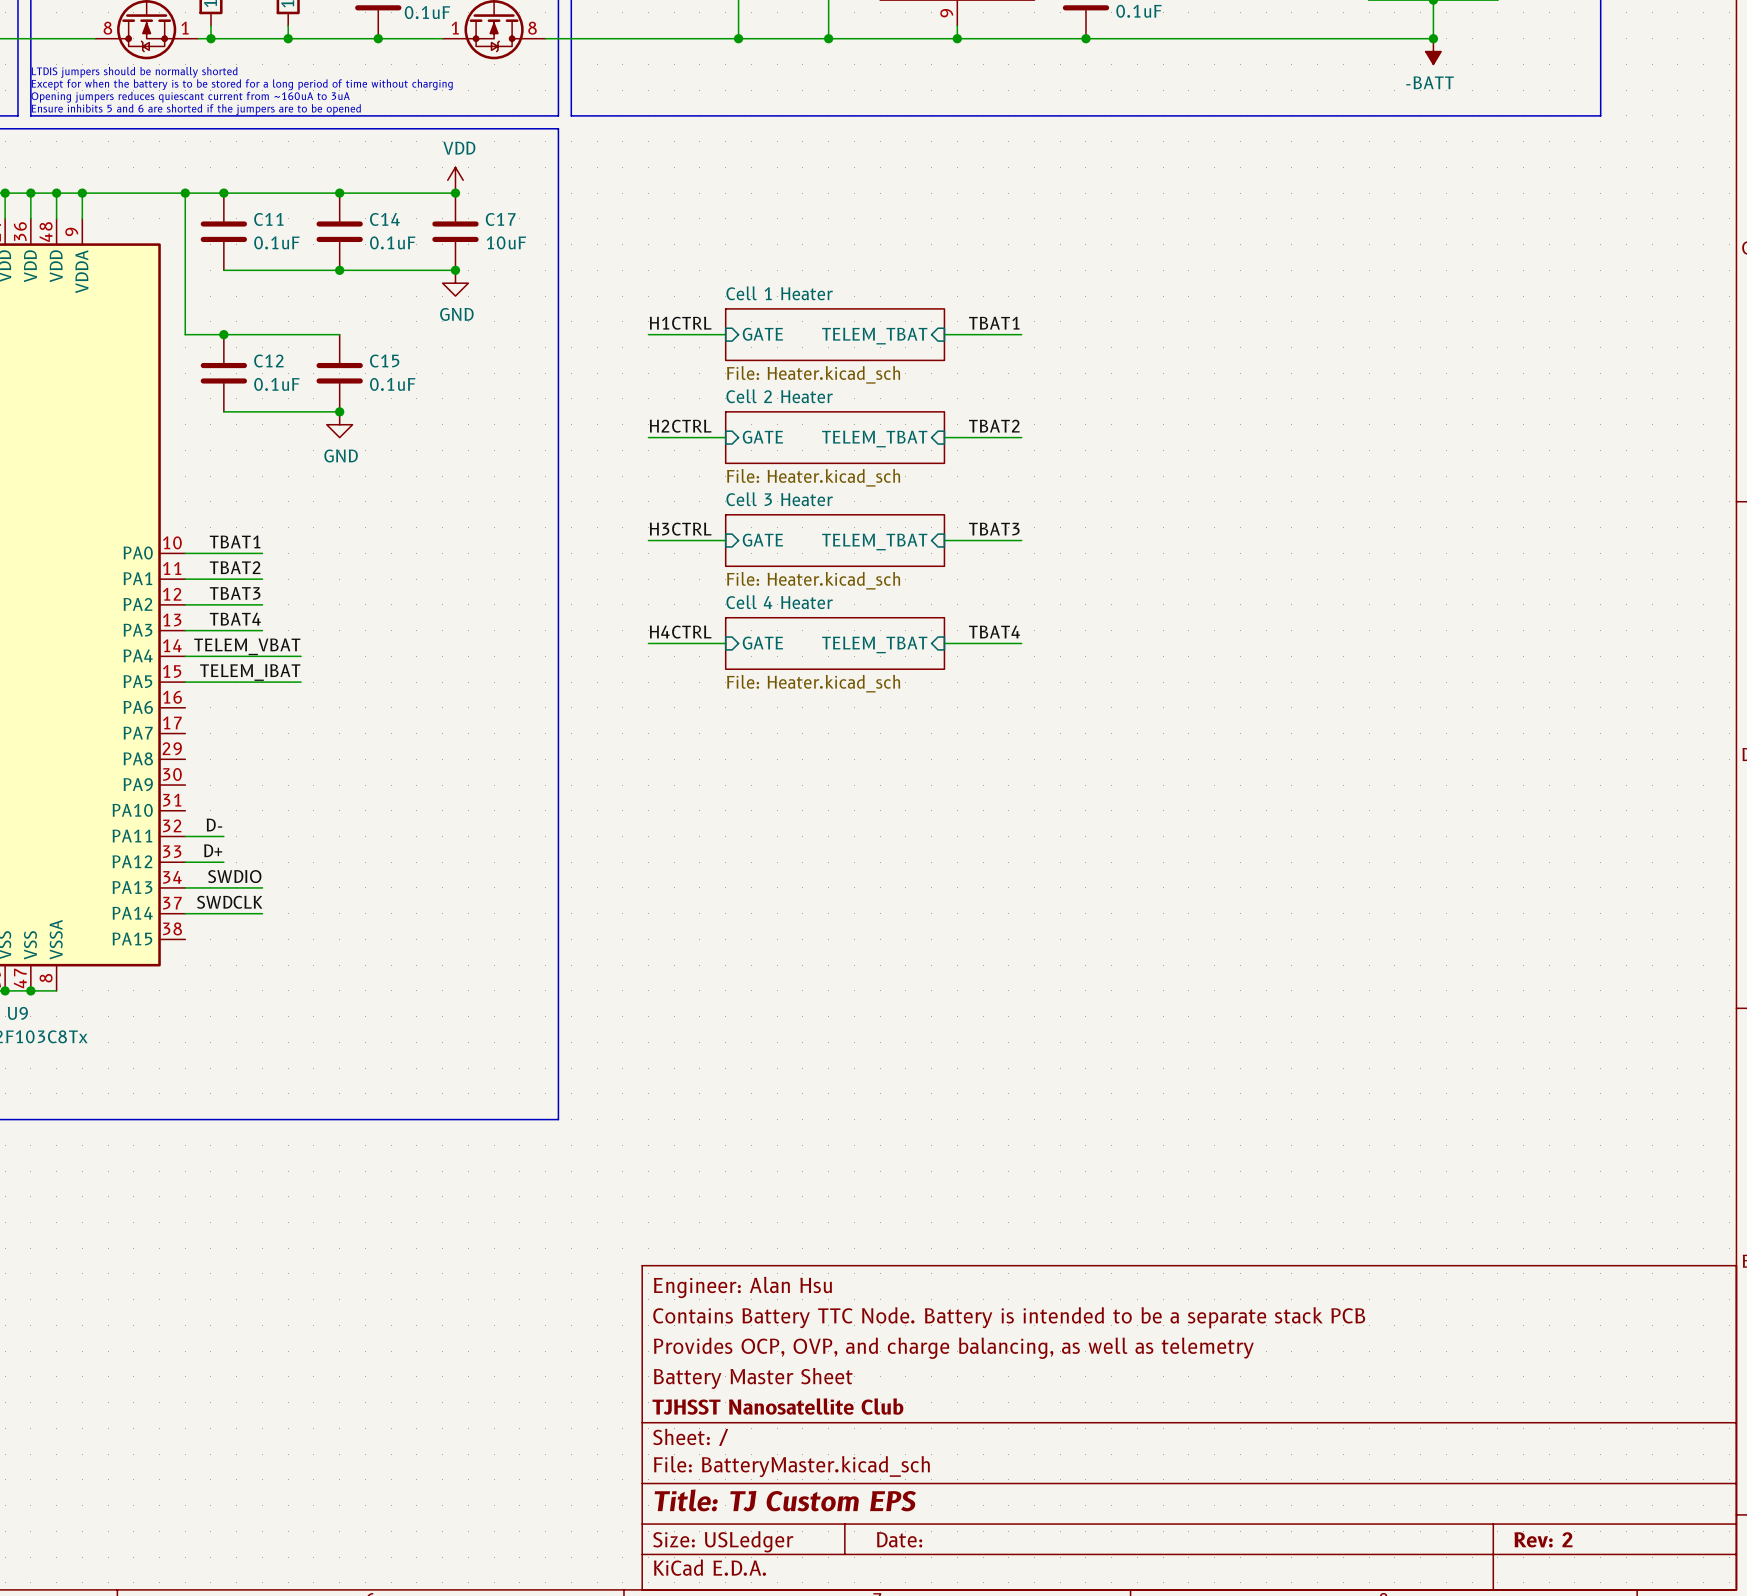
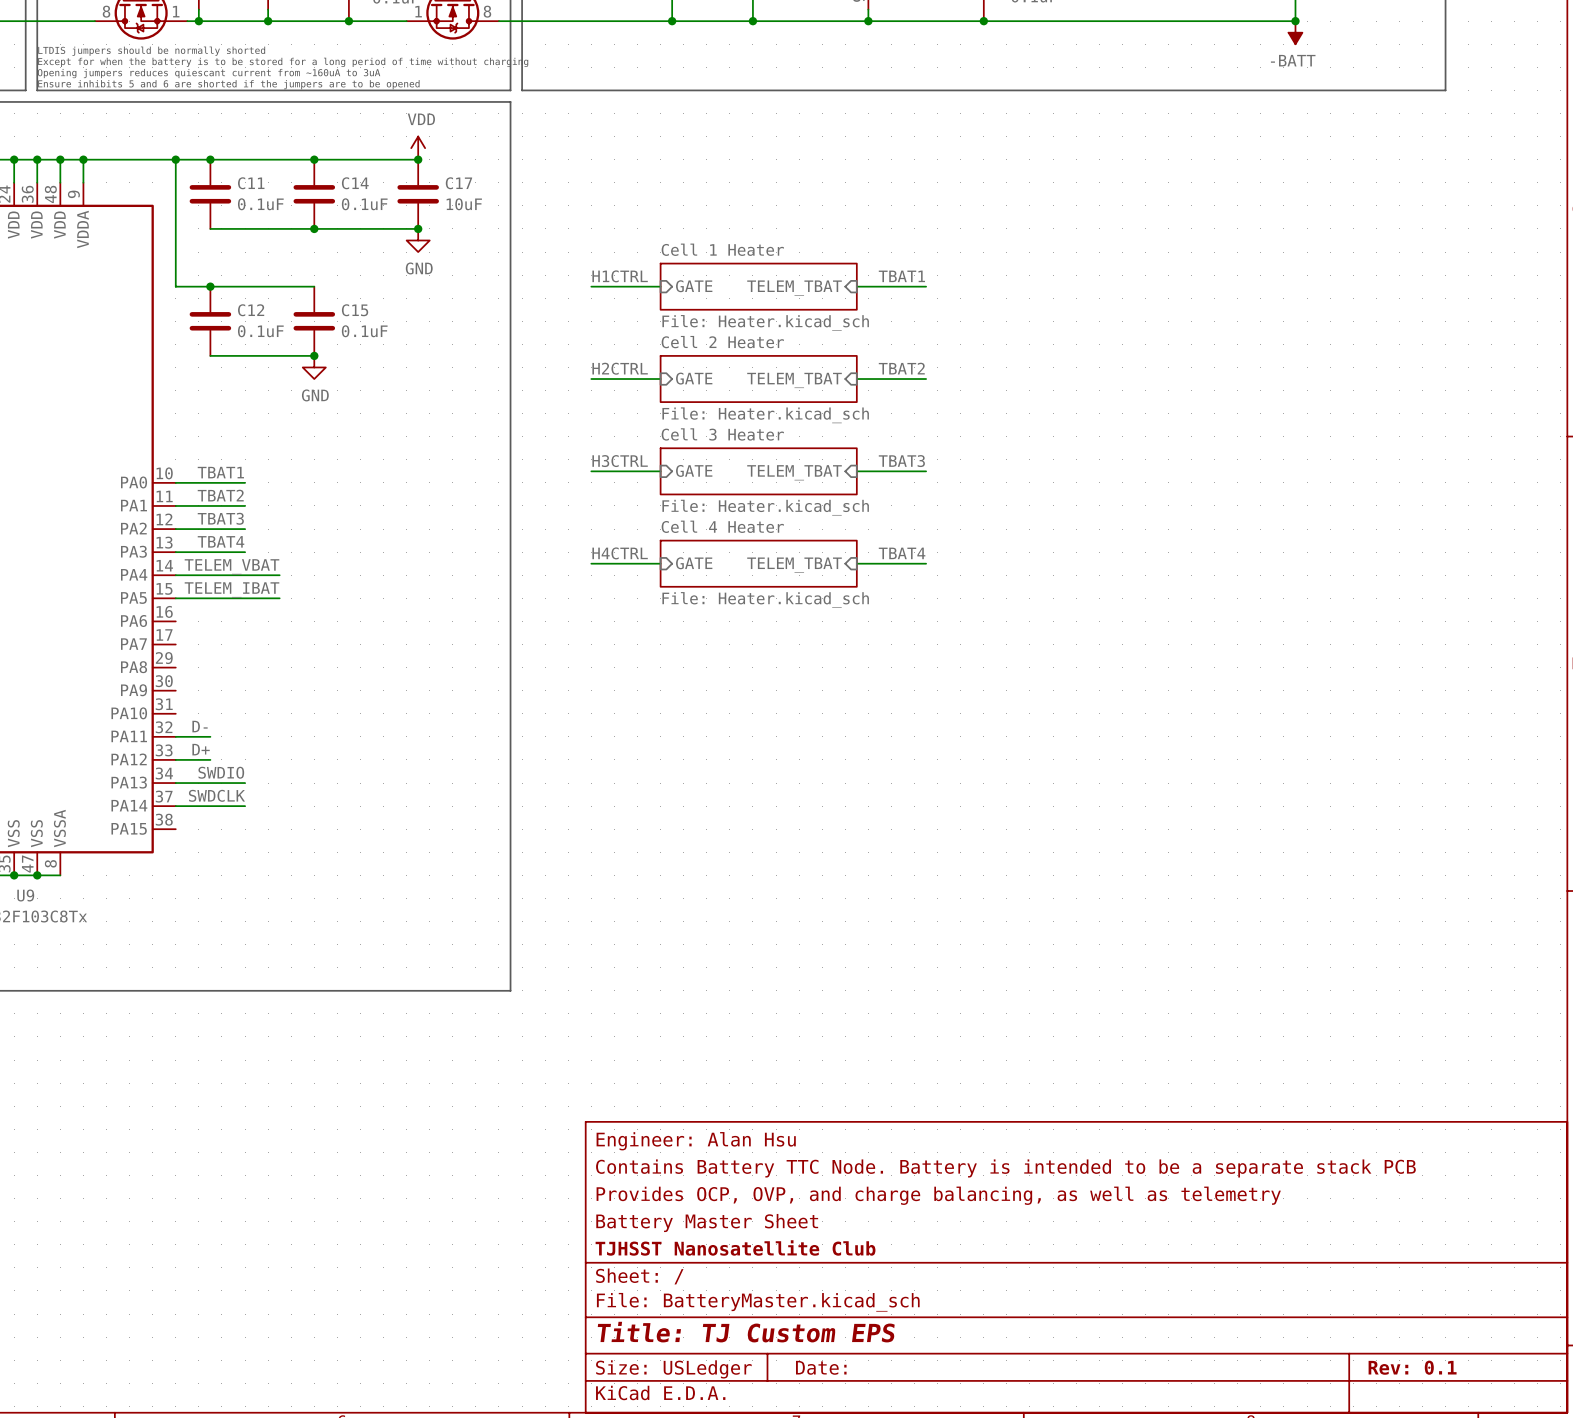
title block: Rev: 2 (1543, 1539) -> Rev: 0.1 (1412, 1367)

